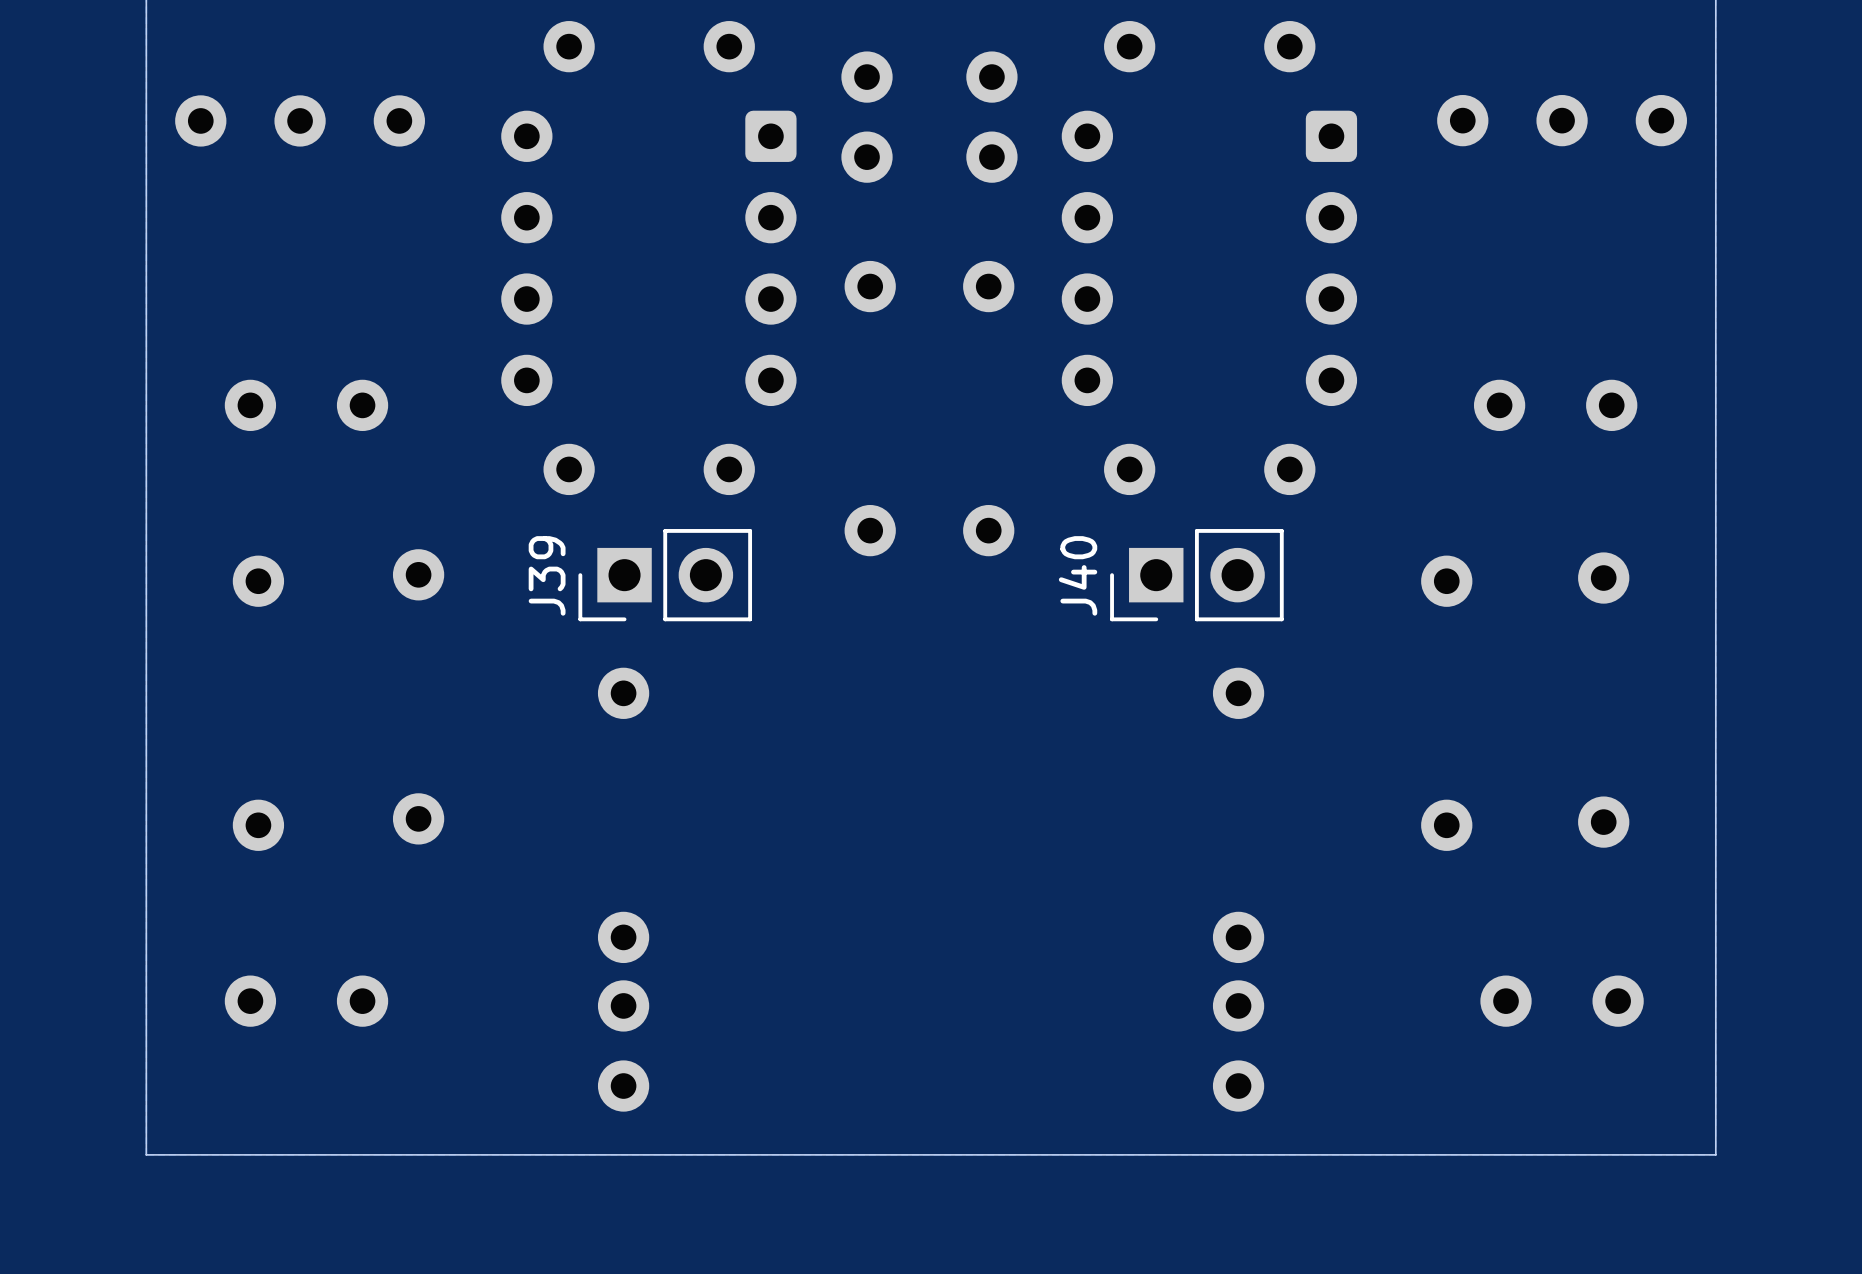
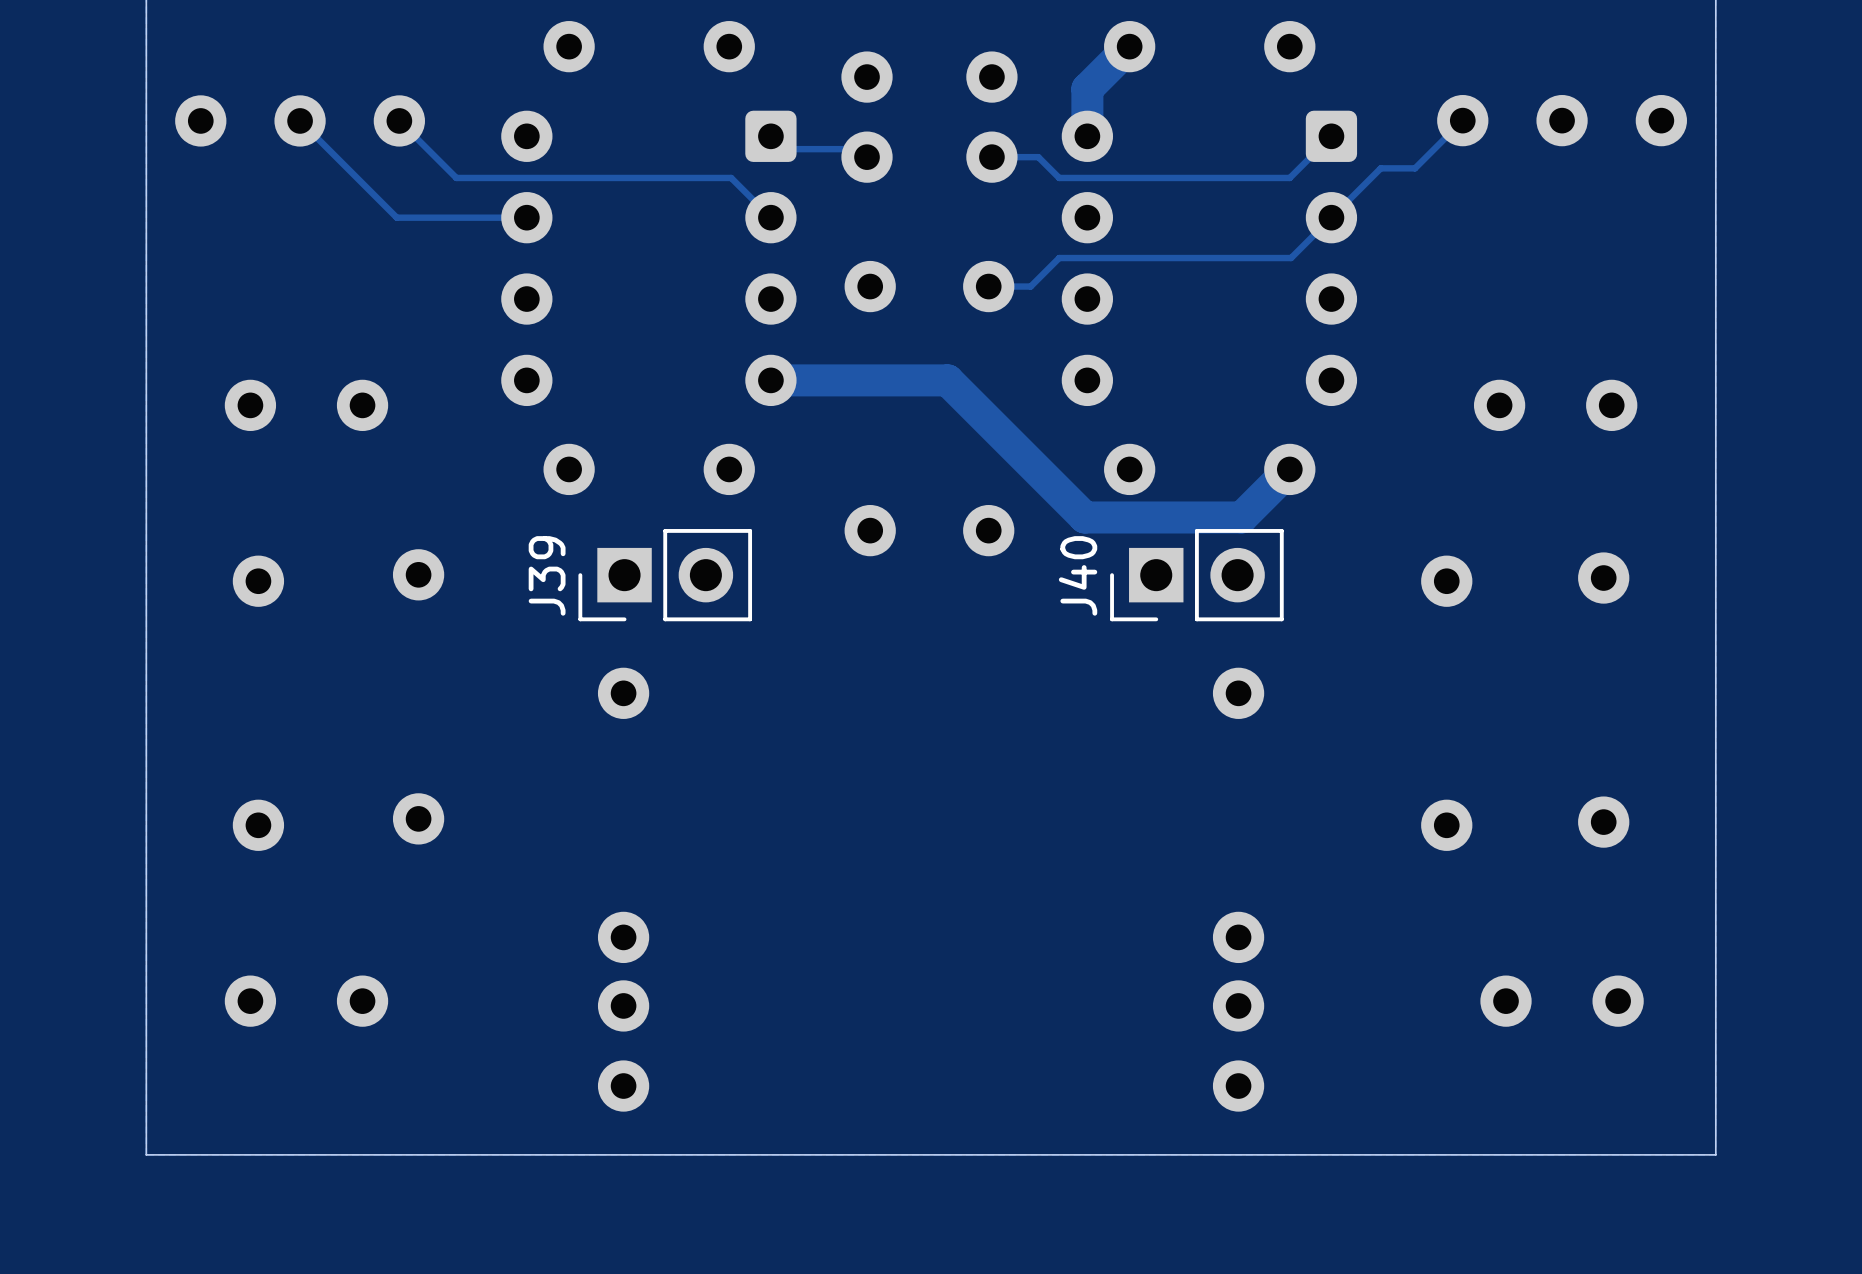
track: none -> (1129, 46) (1087, 88) (1087, 136)
track: none -> (300, 120) (396, 217) (526, 217)
track: none -> (399, 120) (456, 177) (731, 177) (770, 217)
track: none -> (1462, 120) (1415, 168) (1380, 168) (1291, 258) (1059, 258) (1030, 286) (988, 286)
track: none -> (770, 136) (783, 149) (859, 149) (867, 157)
track: none -> (1331, 136) (1289, 177) (1059, 177) (1038, 157) (991, 157)
track: none -> (770, 380) (947, 380) (1084, 517) (1241, 517) (1289, 469)

